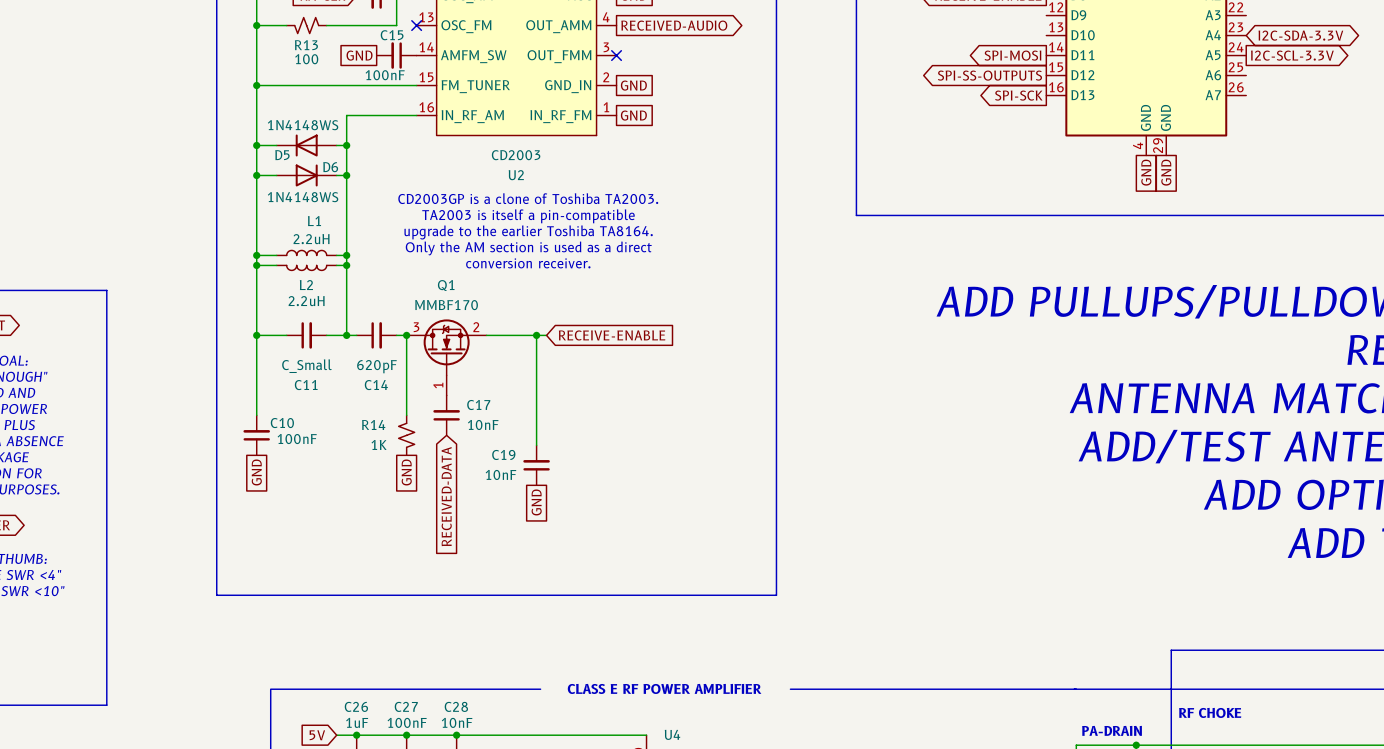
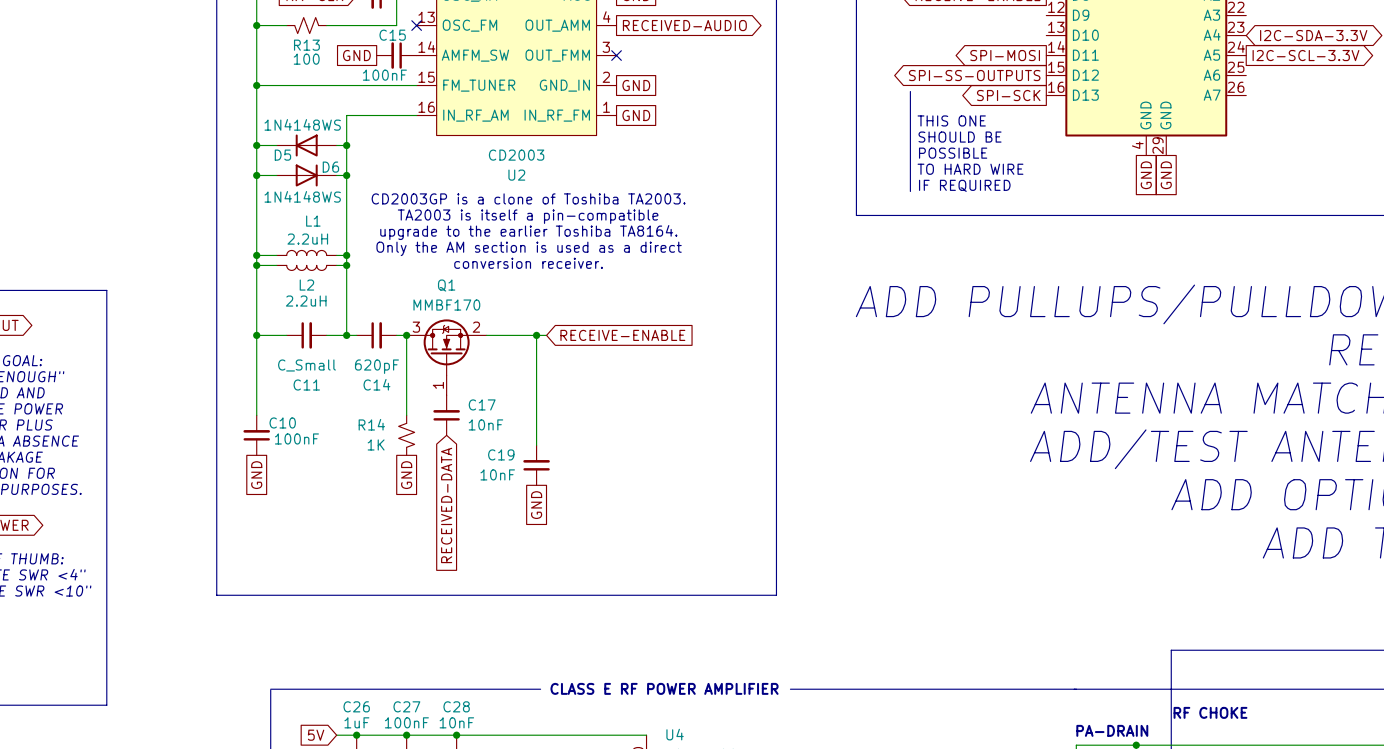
line: none -> (910, 91) (910, 191)
text: none -> THIS ONE (951, 120)
text: none -> SHOULD BE (960, 137)
text: none -> POSSIBLE (953, 153)
text: none -> TO HARD WIRE (970, 169)
text: none -> IF REQUIRED (964, 185)

